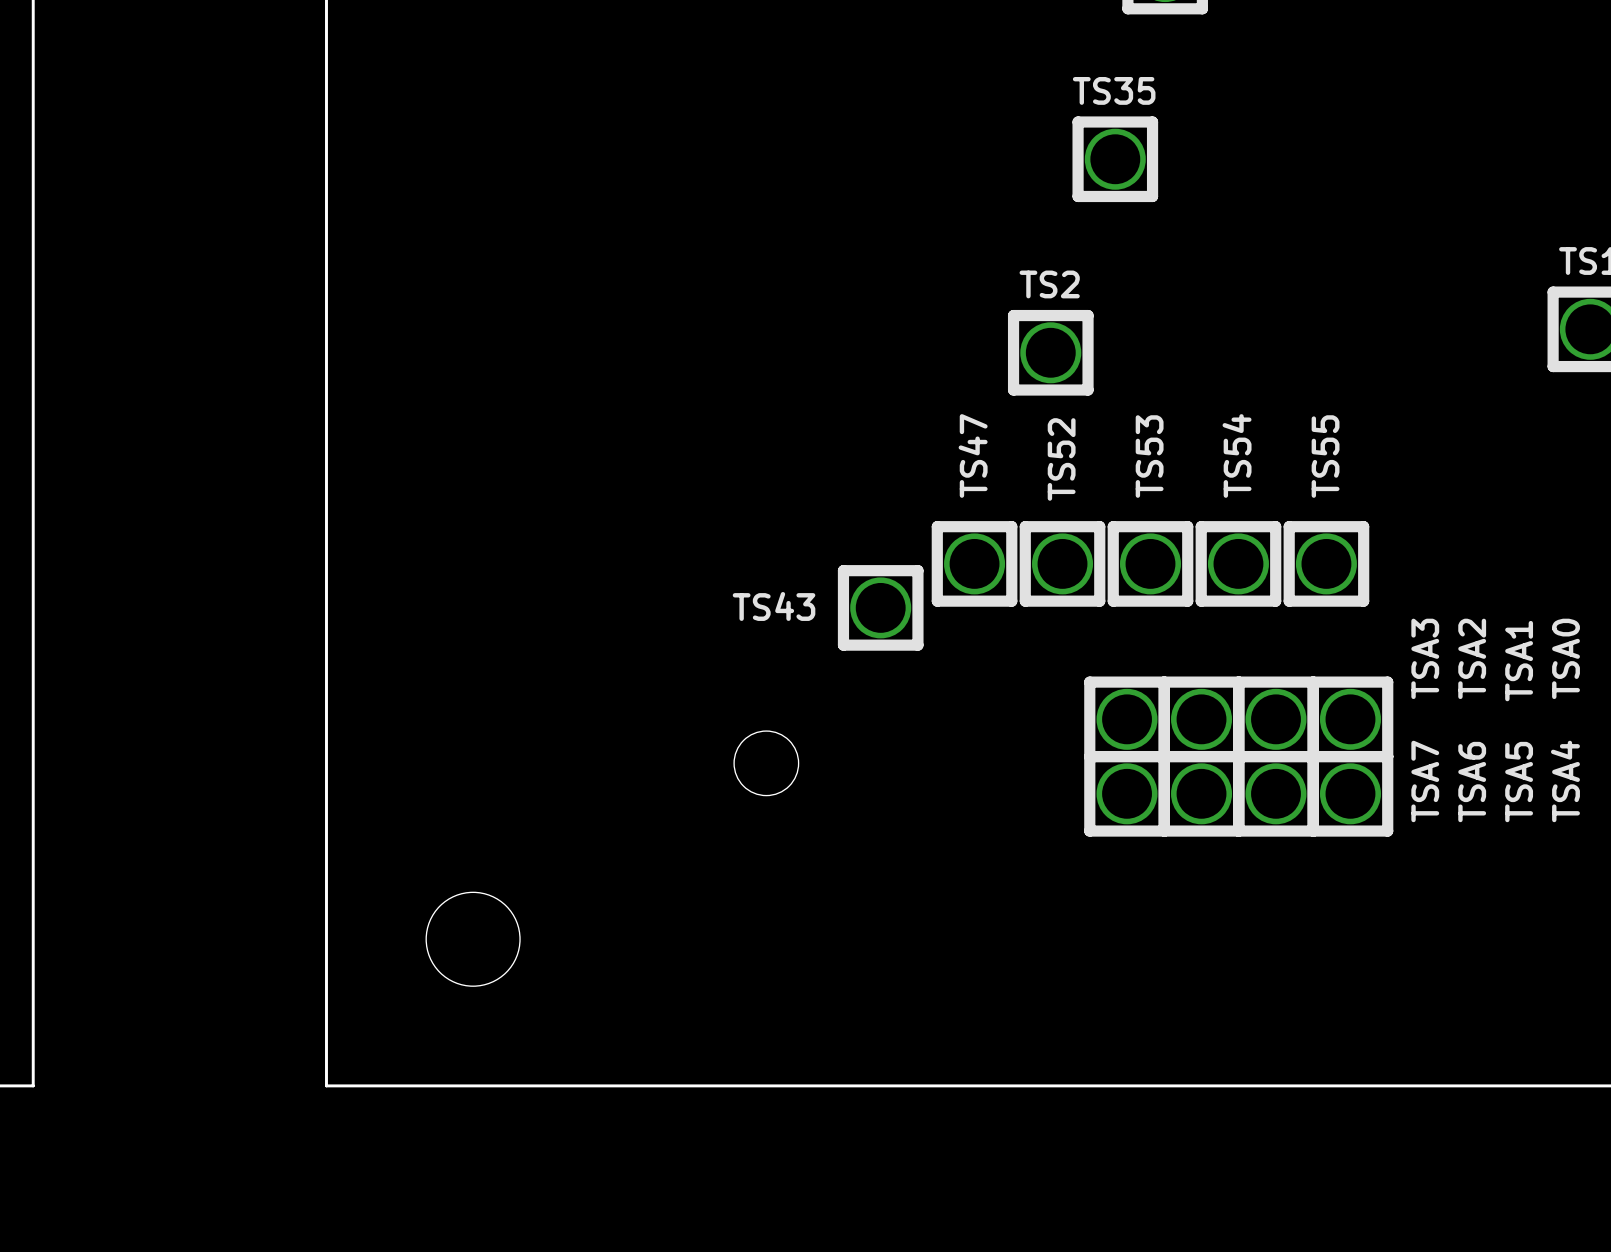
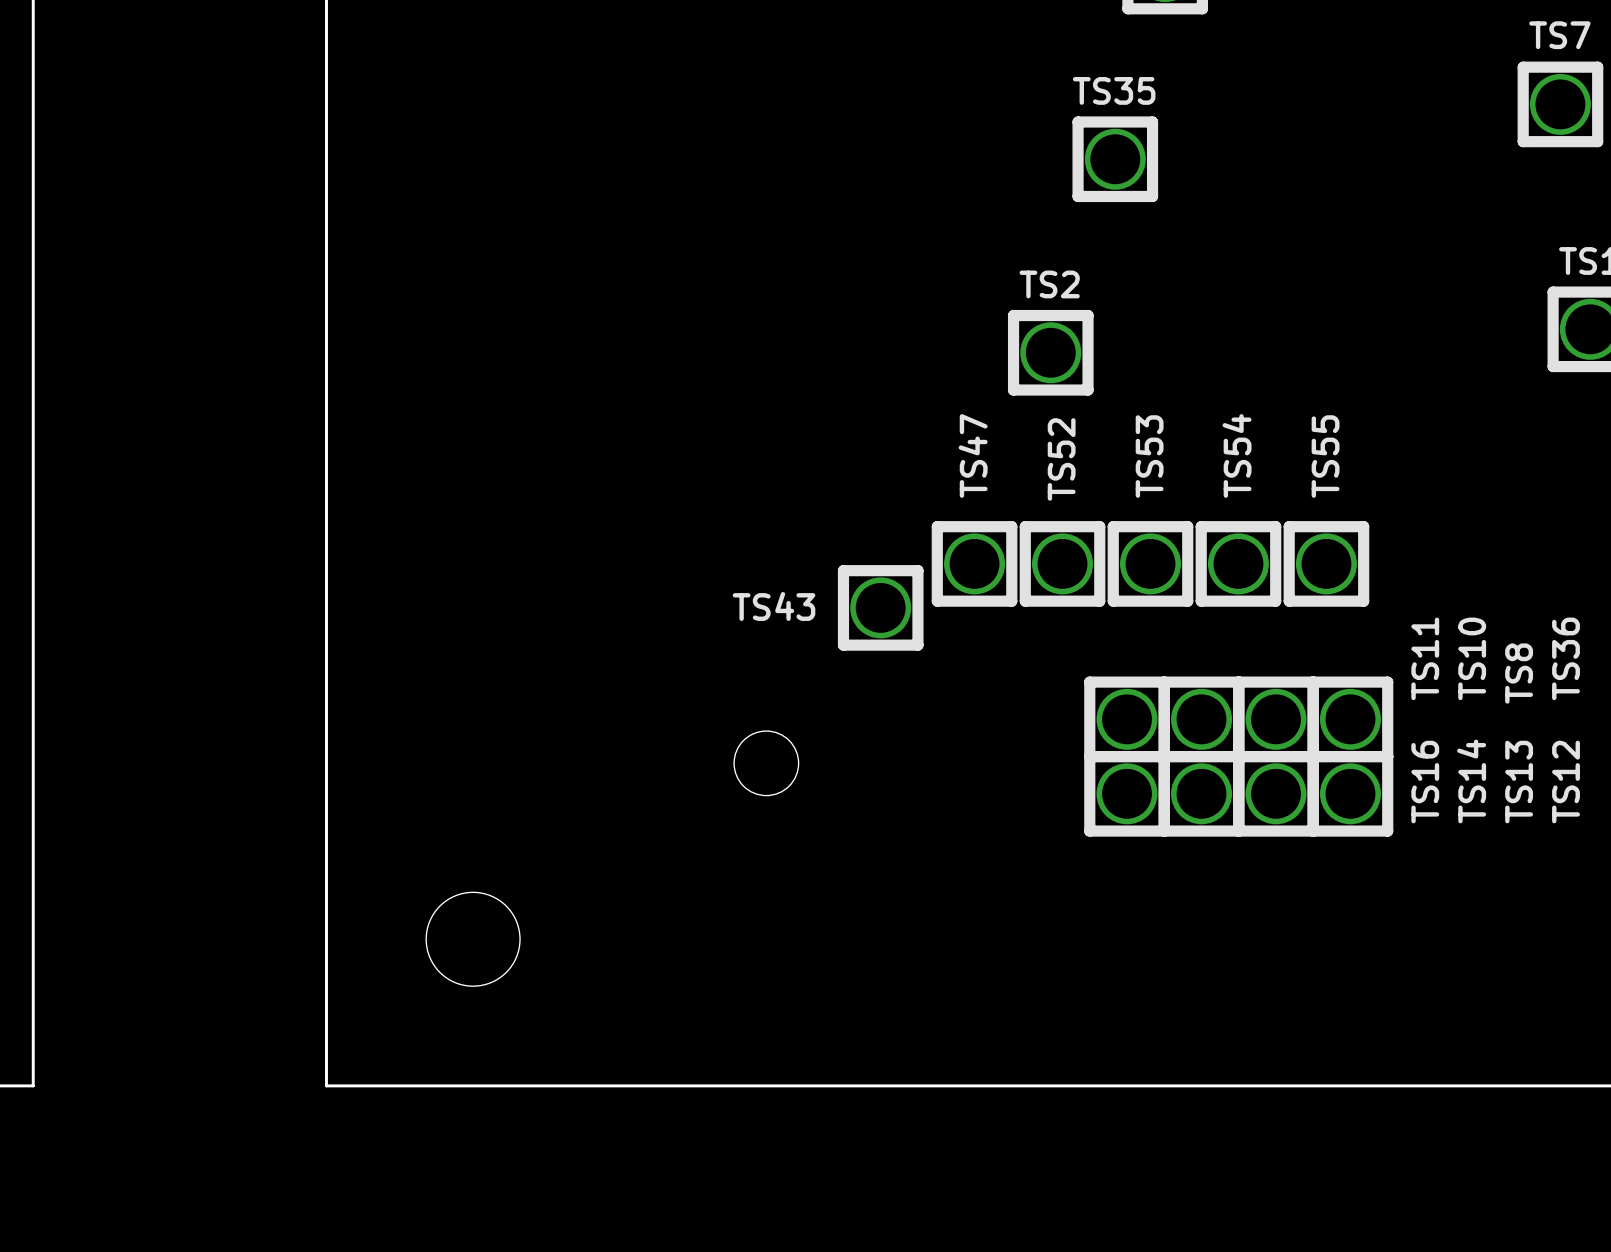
TS7: none -> (1560, 104)
TSA3 name: TSA3 (1425, 658) -> TS11 (1425, 658)
TSA2 name: TSA2 (1472, 658) -> TS10 (1472, 658)
TSA0 name: TSA0 (1566, 658) -> TS36 (1566, 658)
TSA1 name: TSA1 (1519, 661) -> TS8 (1519, 673)
TSA7 name: TSA7 (1425, 781) -> TS16 (1425, 782)
TSA4 name: TSA4 (1565, 781) -> TS12 (1566, 782)
TSA6 name: TSA6 (1472, 782) -> TS14 (1471, 781)
TSA5 name: TSA5 (1519, 782) -> TS13 (1519, 782)

